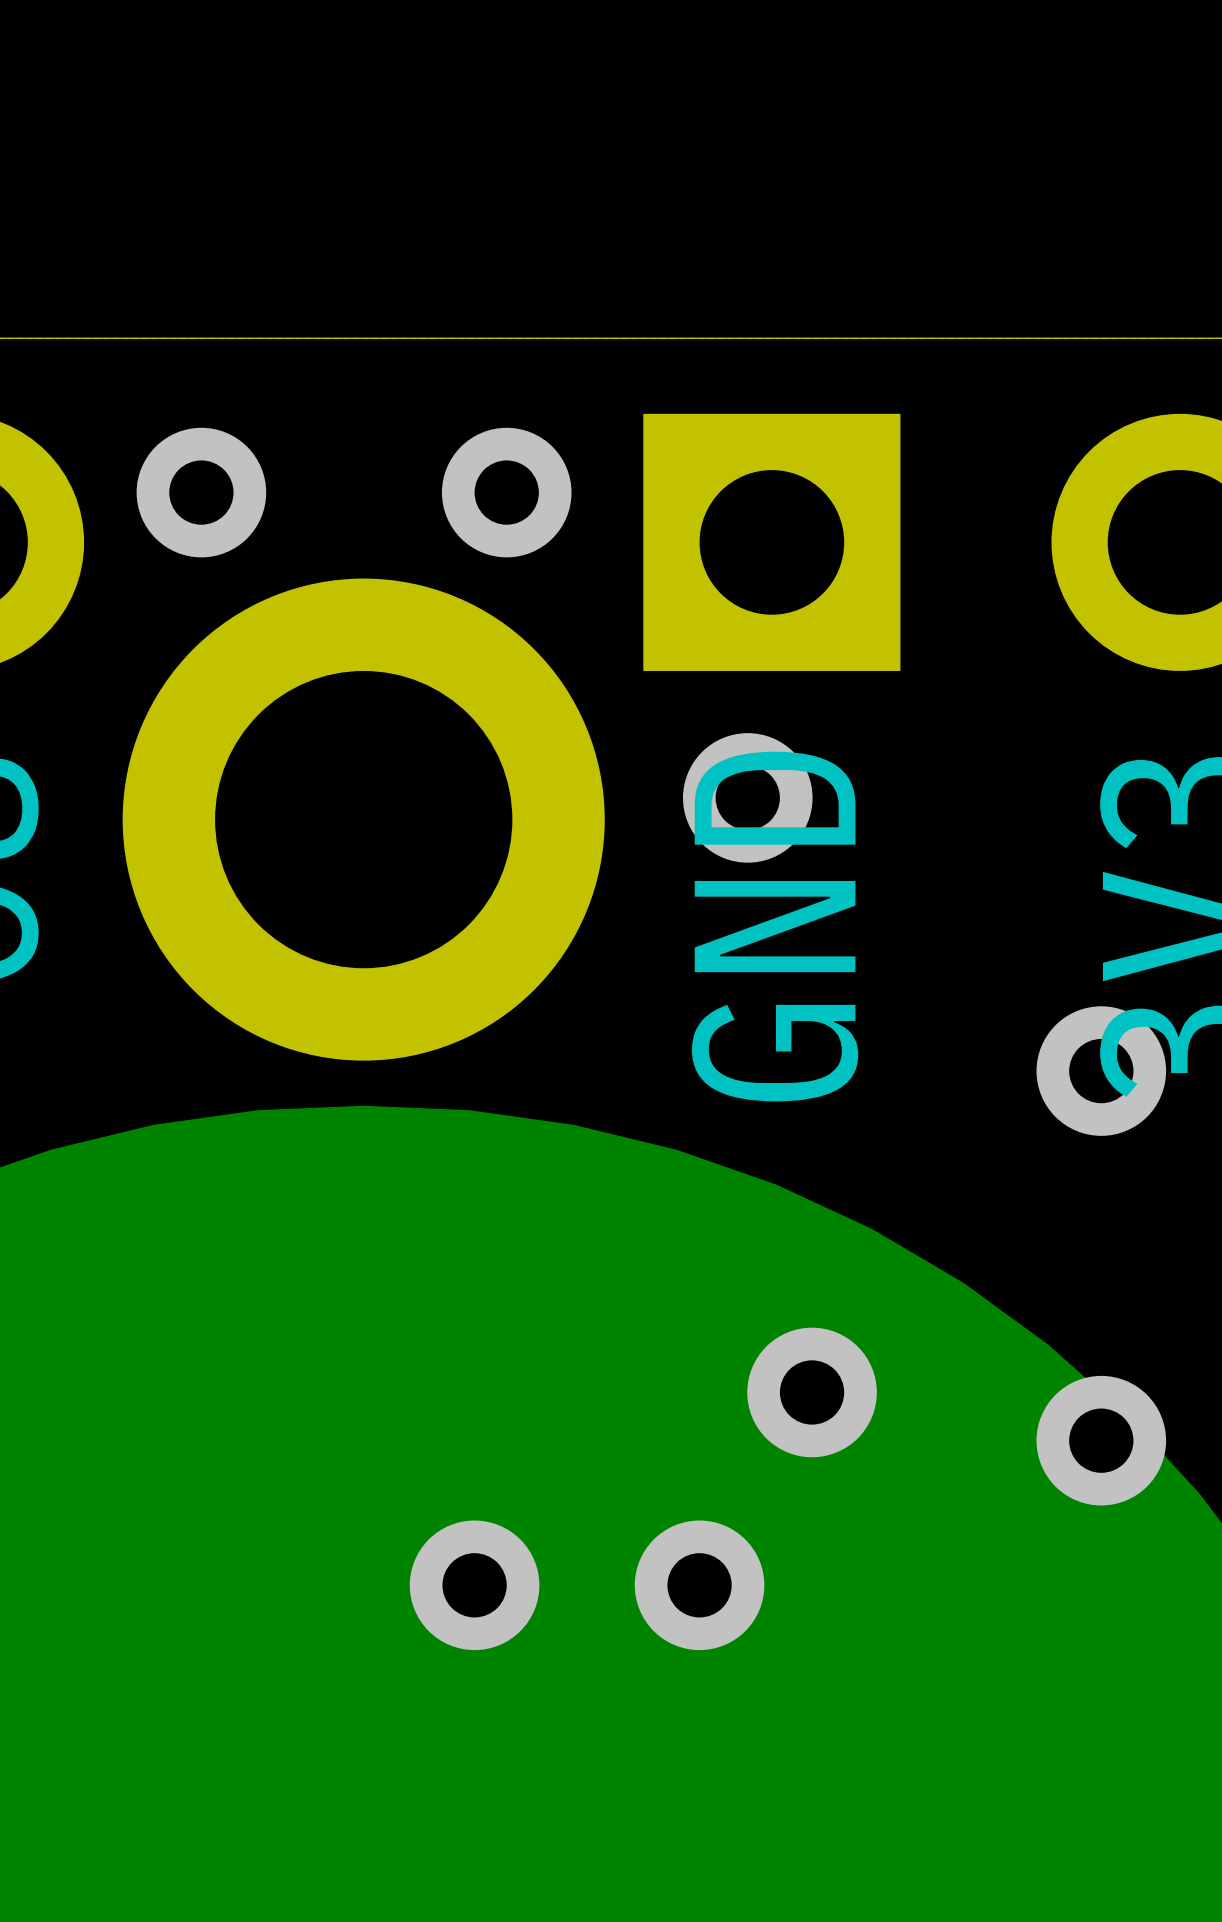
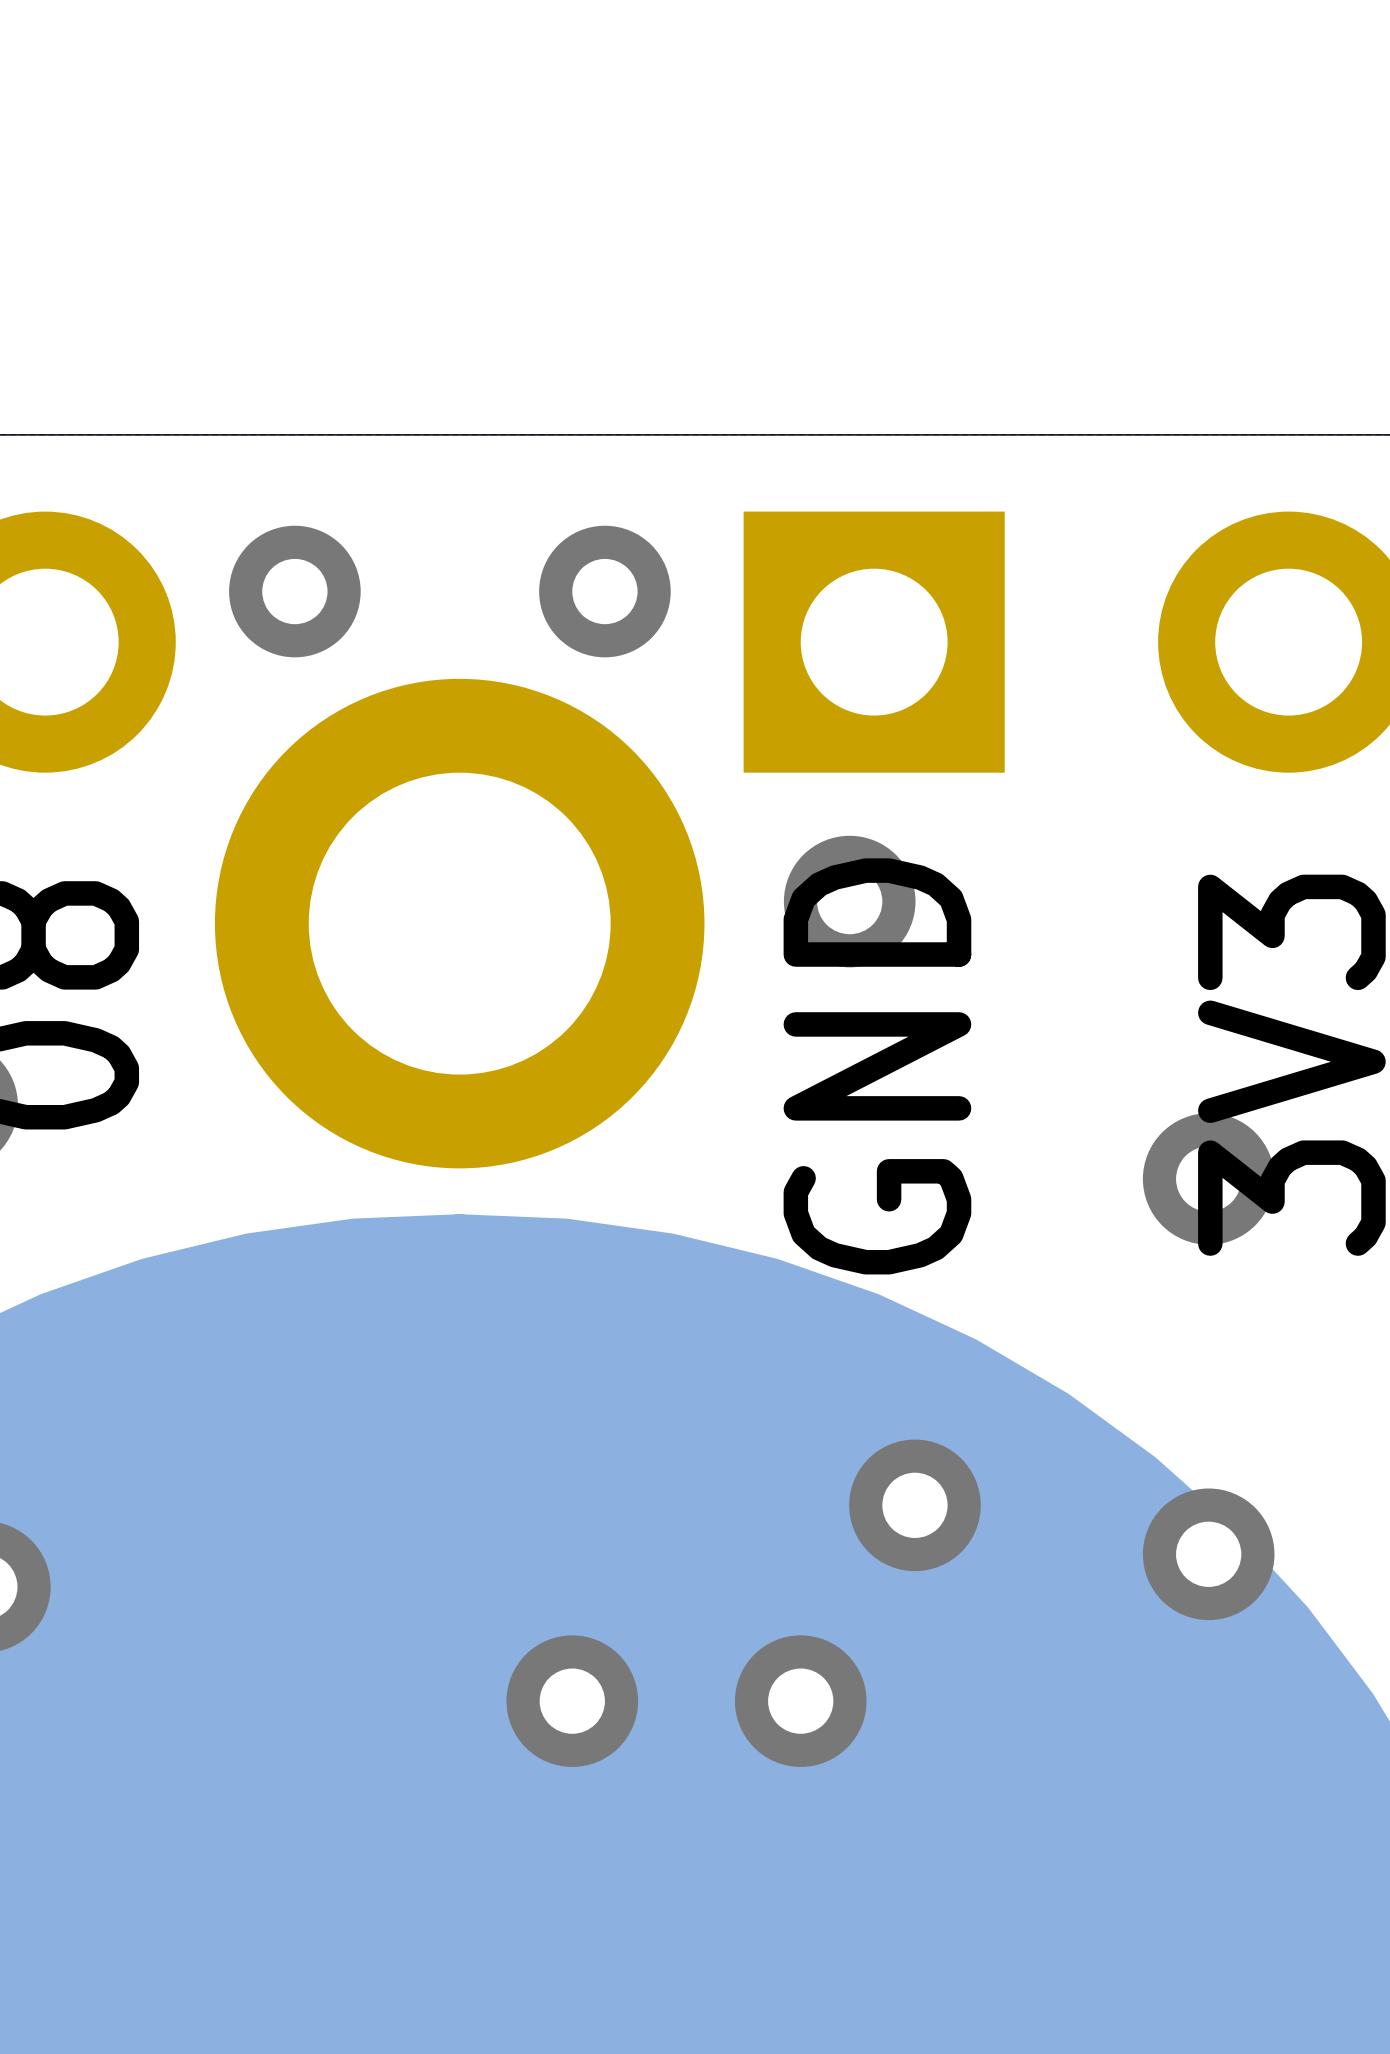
text position: GND (775, 926) -> GND (877, 1066)

